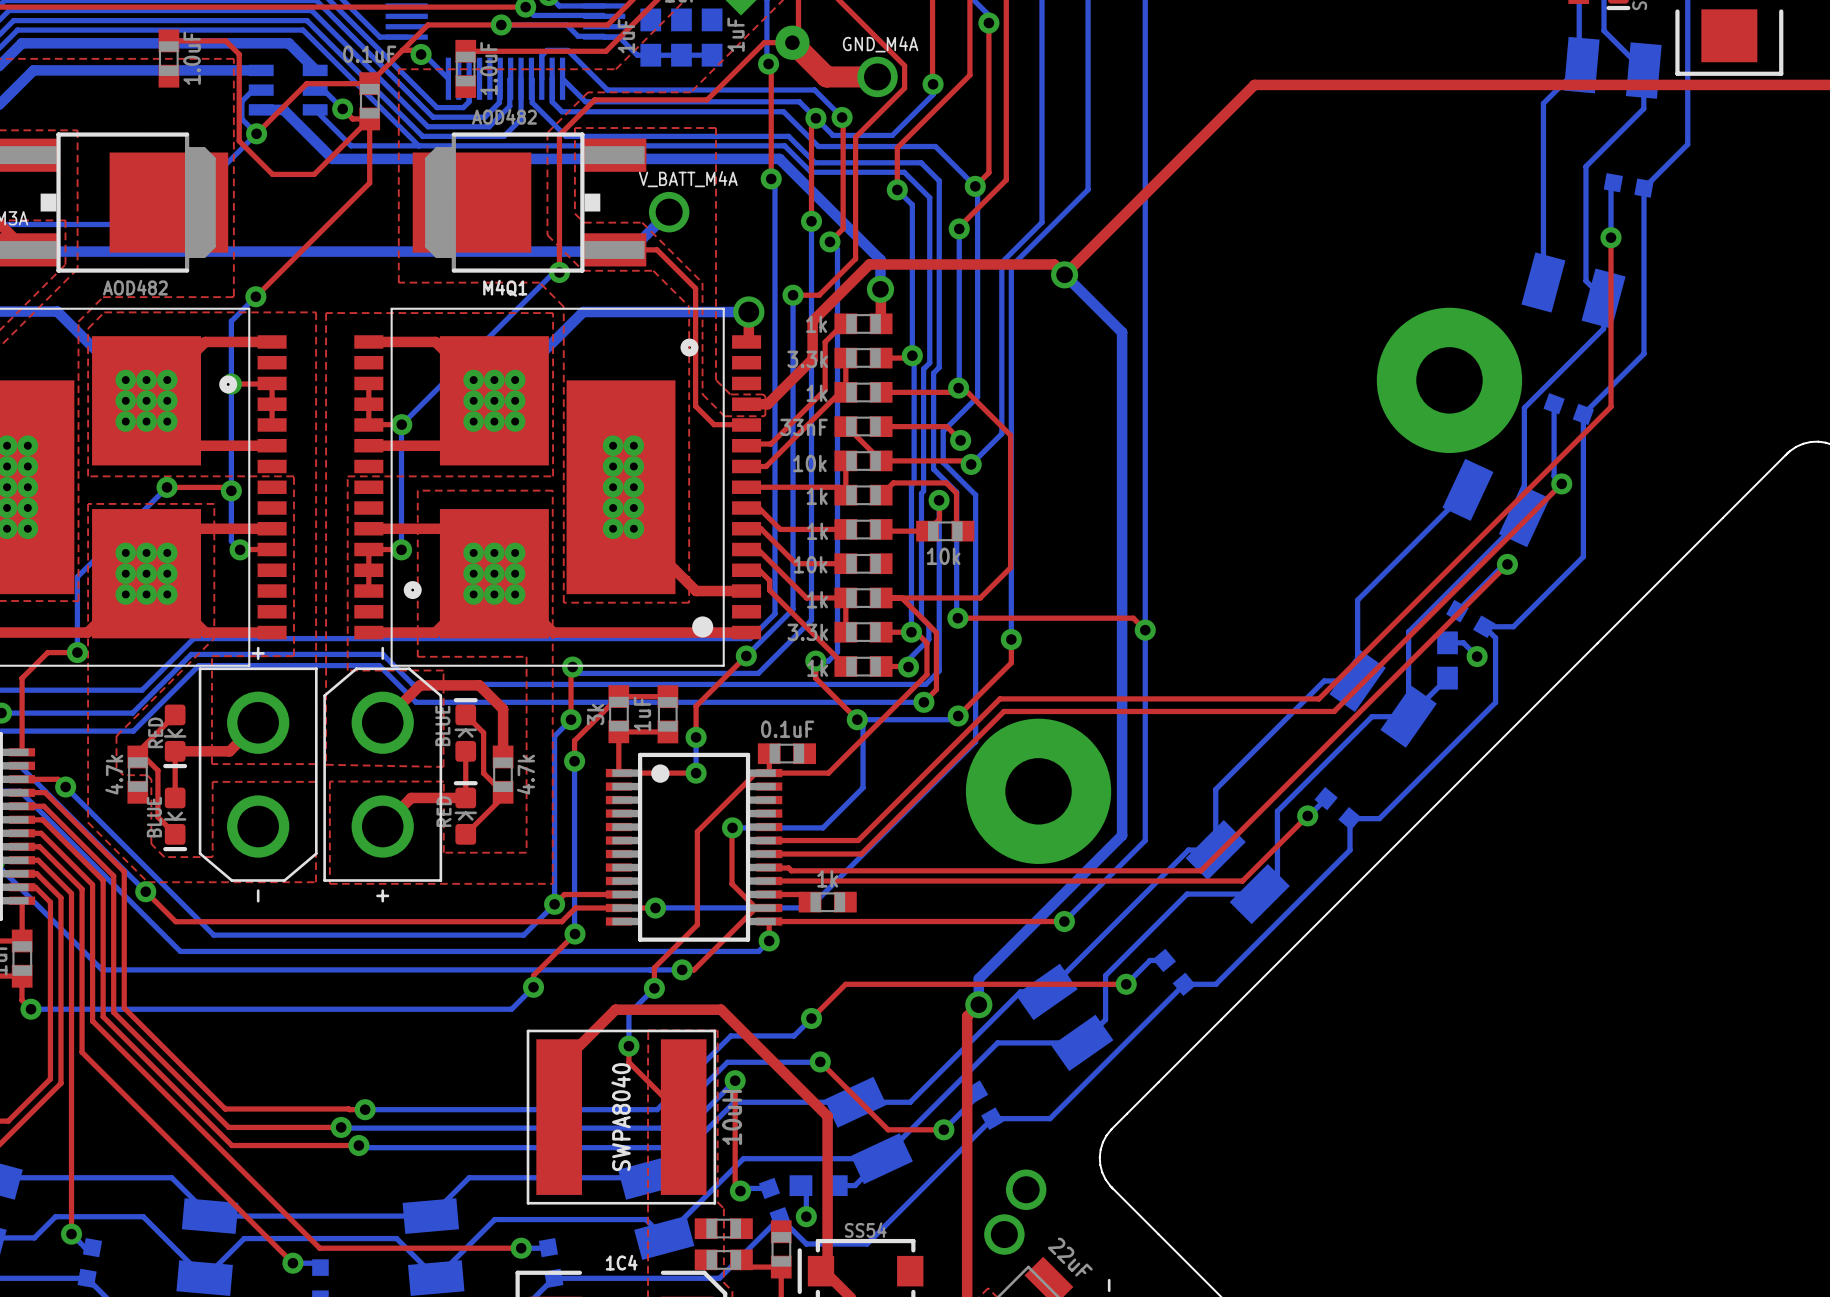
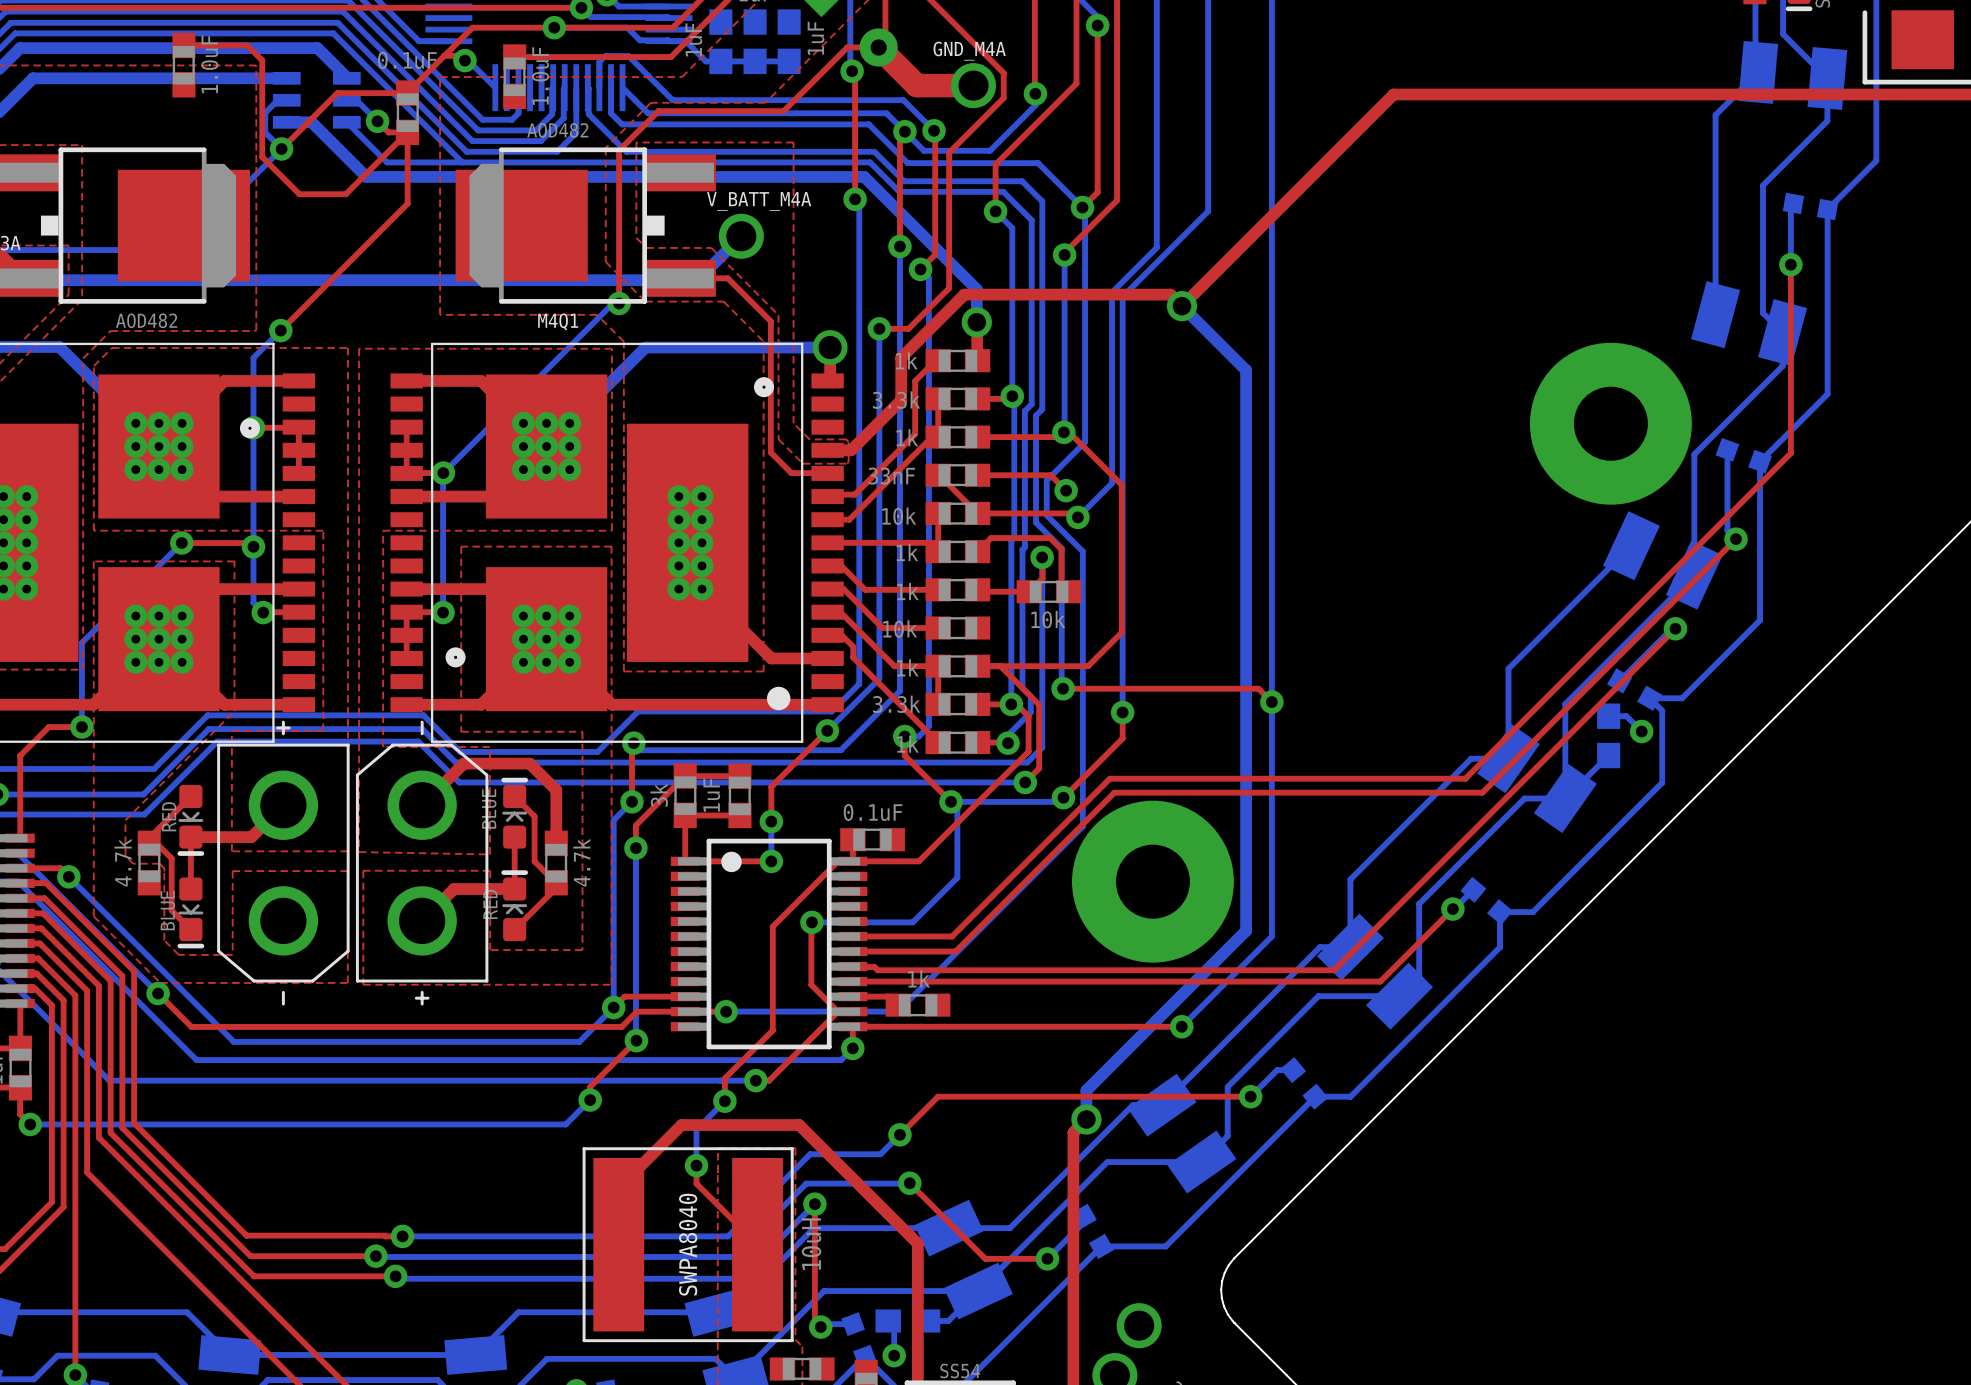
bottom track: (576, 638) (193, 638) (190, 642) -> (638, 711) (597, 751) (460, 751) (423, 715) (207, 715)

